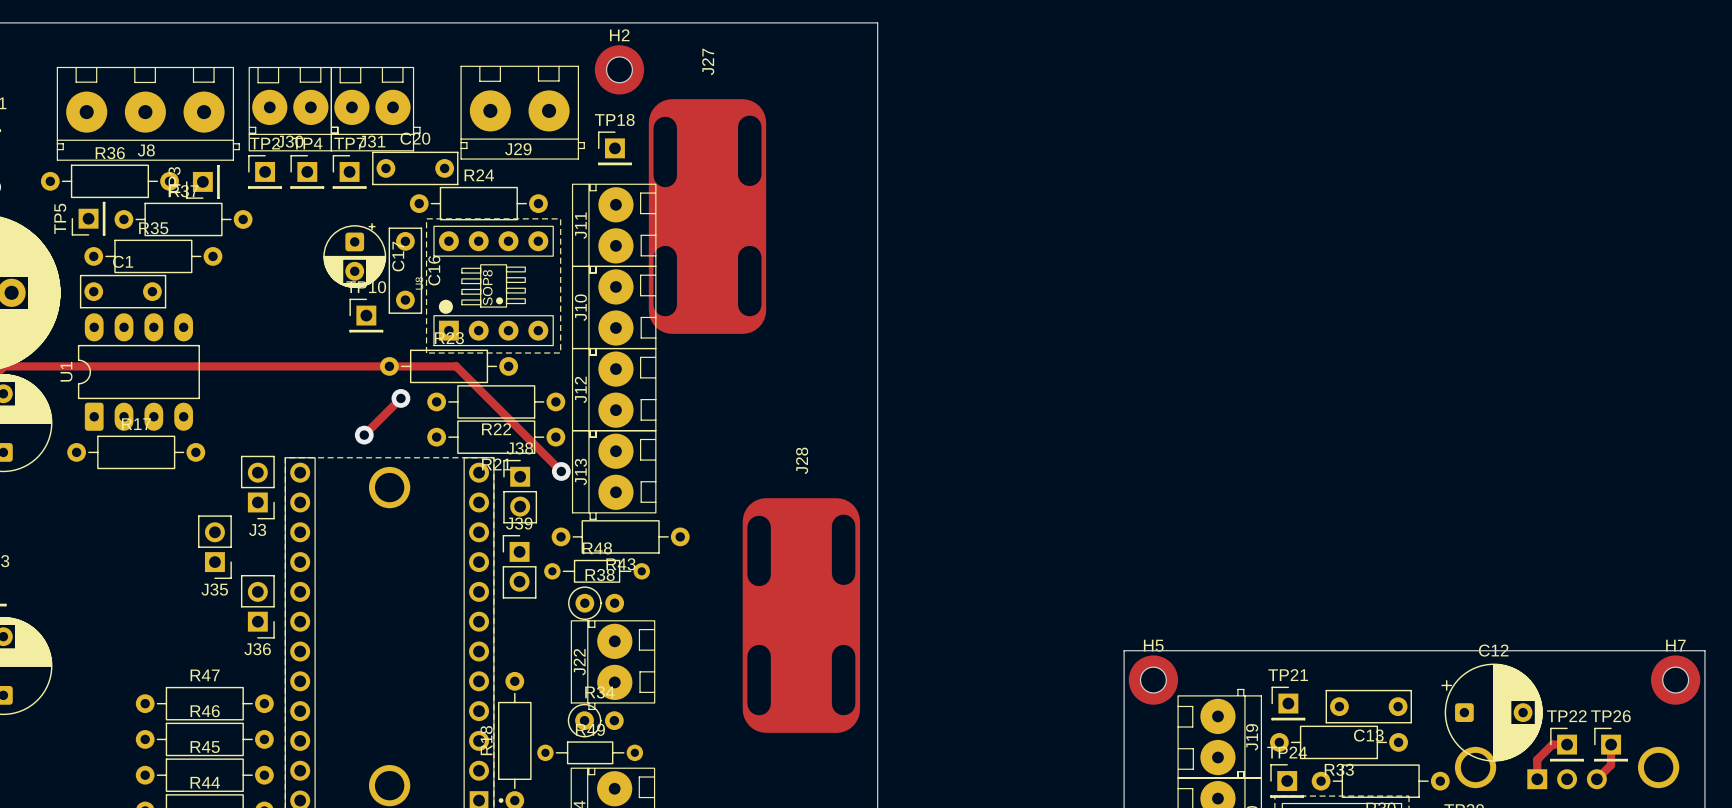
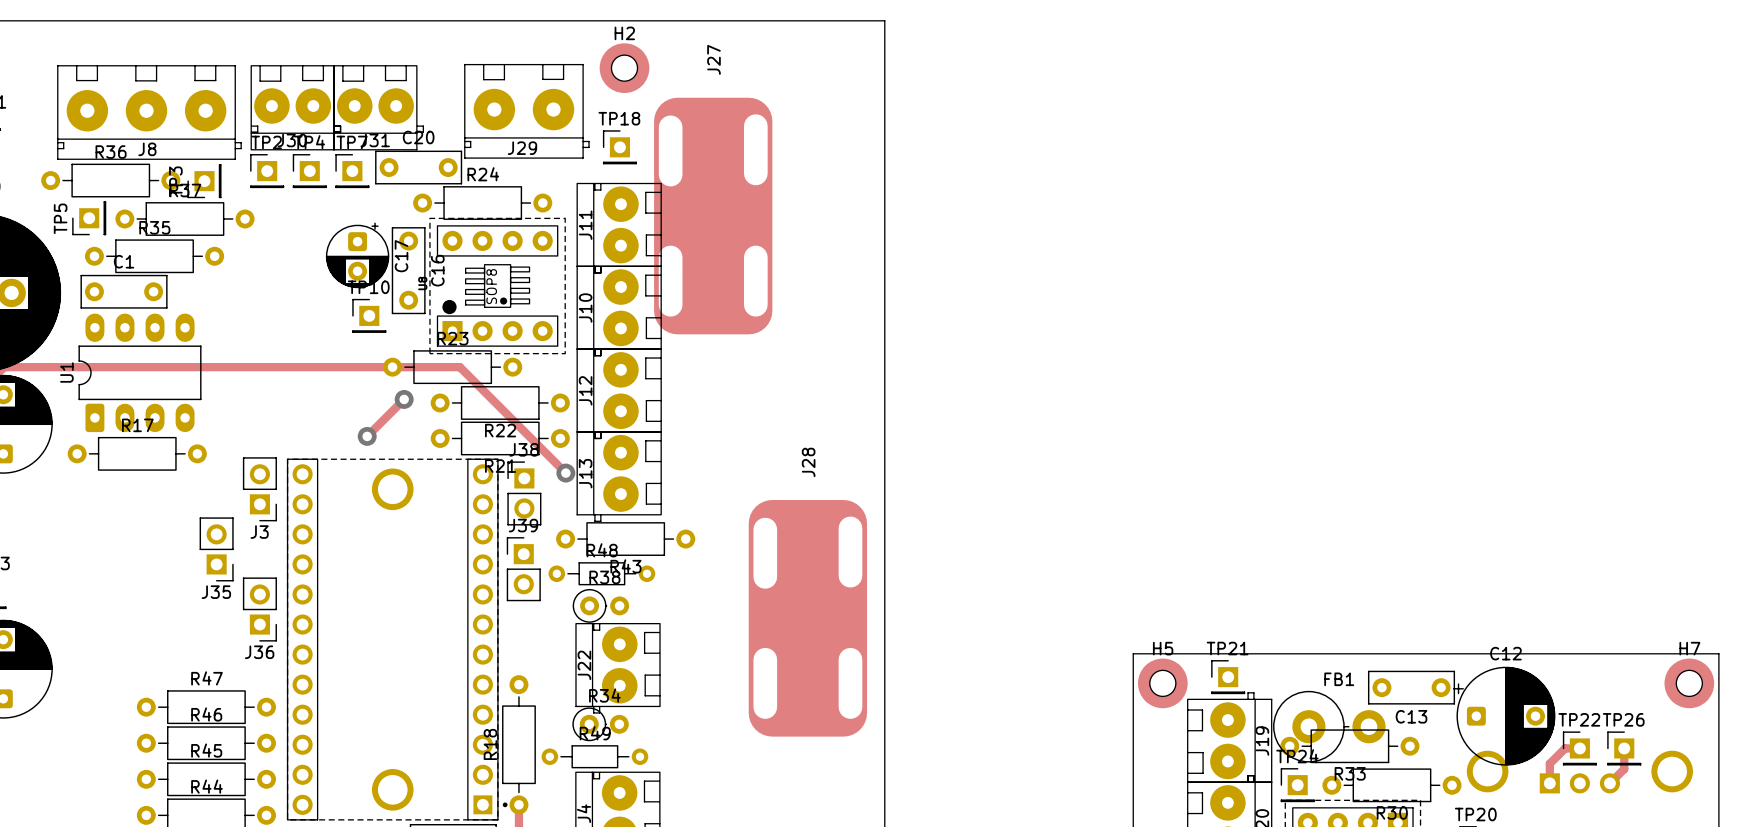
TP21 position: (1288, 703) -> (1228, 677)
C13 position: (1368, 706) -> (1411, 687)
FB1: none -> (1329, 726)

